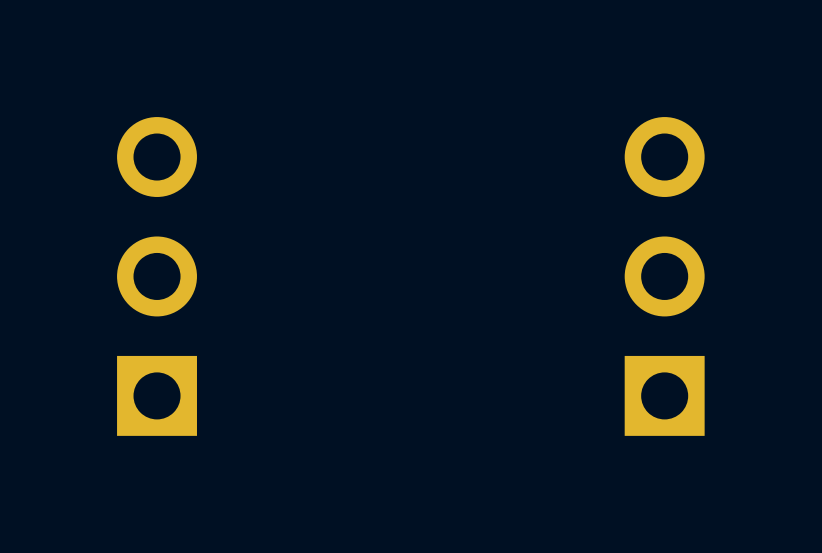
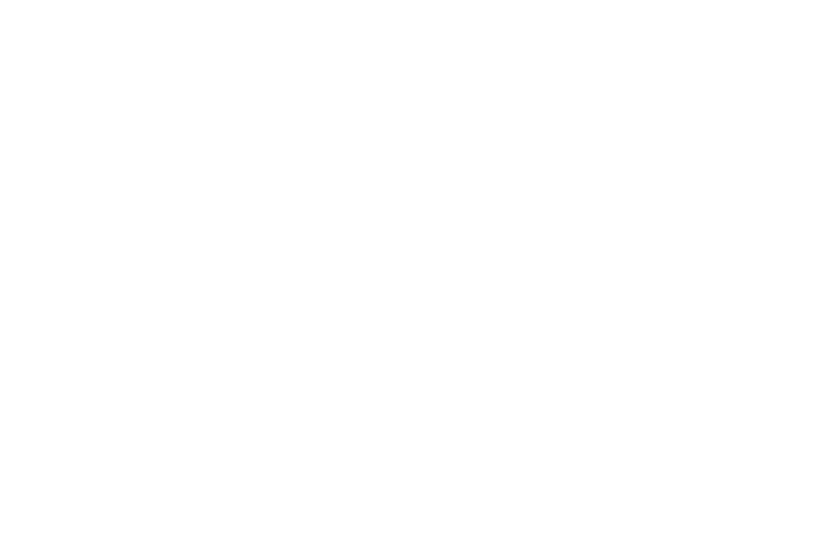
part: (157, 276) -> none
part: (664, 276) -> none

